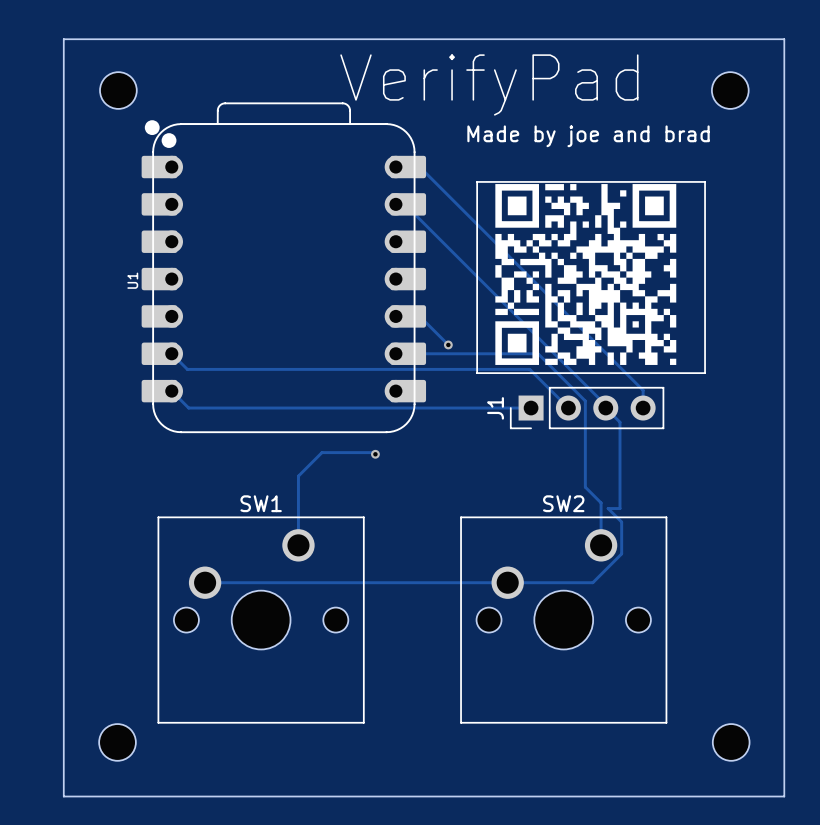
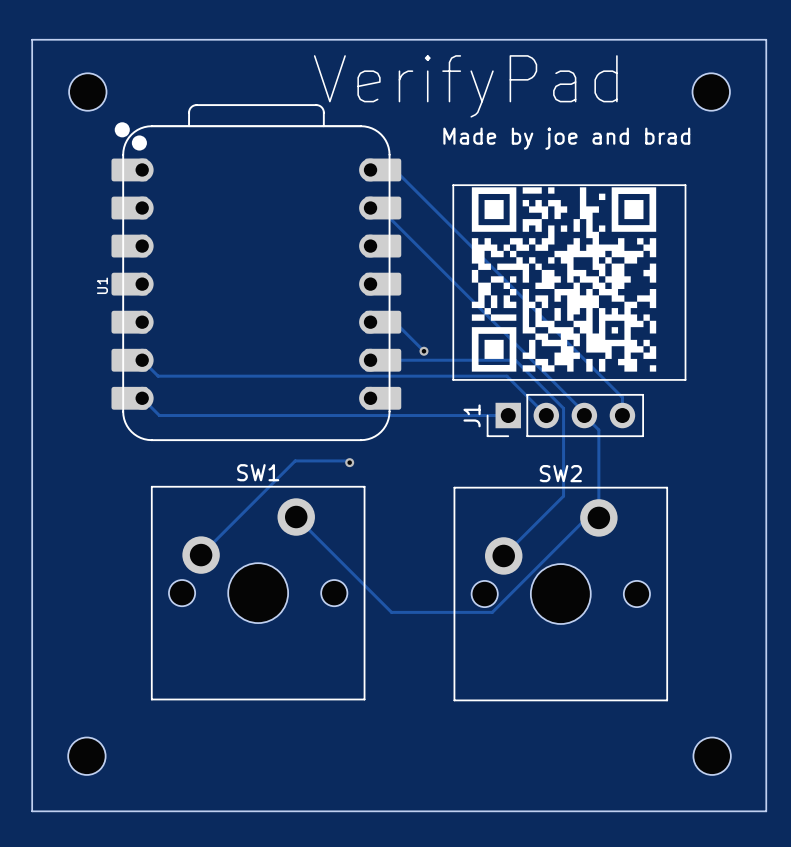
track: (298, 476) (298, 545) -> (271, 484) (201, 555)
track: (585, 487) (601, 502) (601, 545) -> (563, 496) (503, 555)
track: (608, 508) (621, 522) (621, 553) (592, 582) (205, 582) -> (586, 517) (492, 612) (391, 612) (296, 517)
SW1 footprint: [157, 516, 365, 724] -> [150, 485, 366, 701]
SW2 footprint: [460, 516, 668, 724] -> [453, 486, 669, 702]

